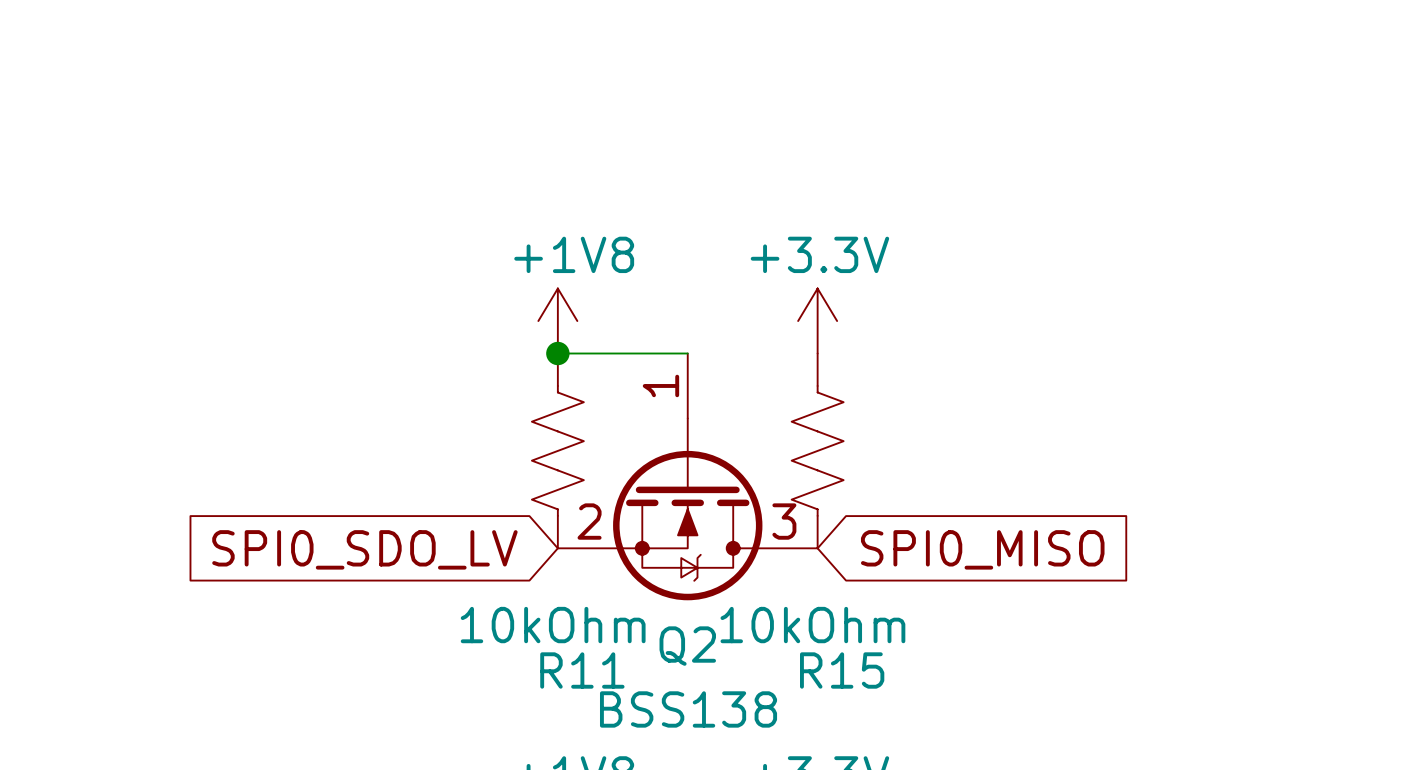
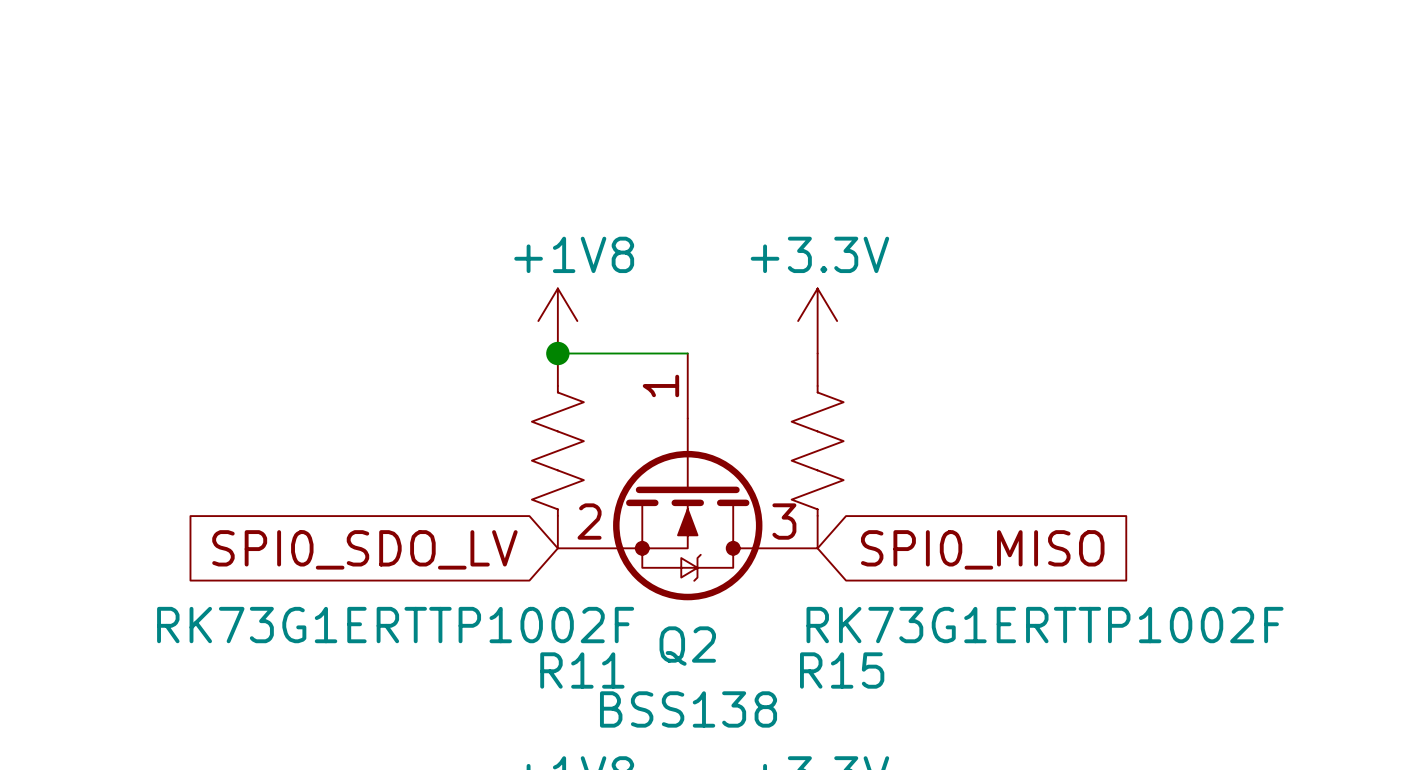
R11 value: 10kOhm (553, 625) -> RK73G1ERTTP1002F (395, 625)
R15 value: 10kOhm (812, 625) -> RK73G1ERTTP1002F (1045, 625)

